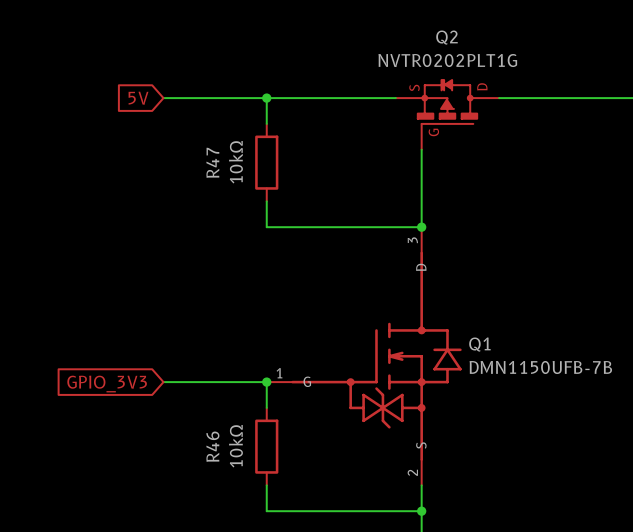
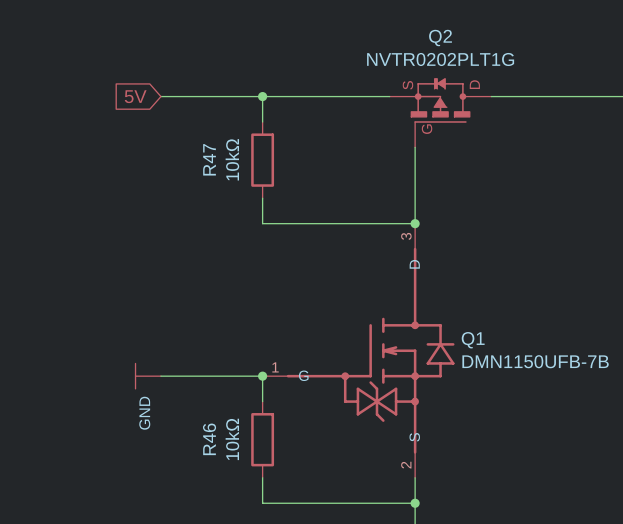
power symbol: none -> GND (148, 376)
global label: GPIO_3V3 (107, 384) -> none

